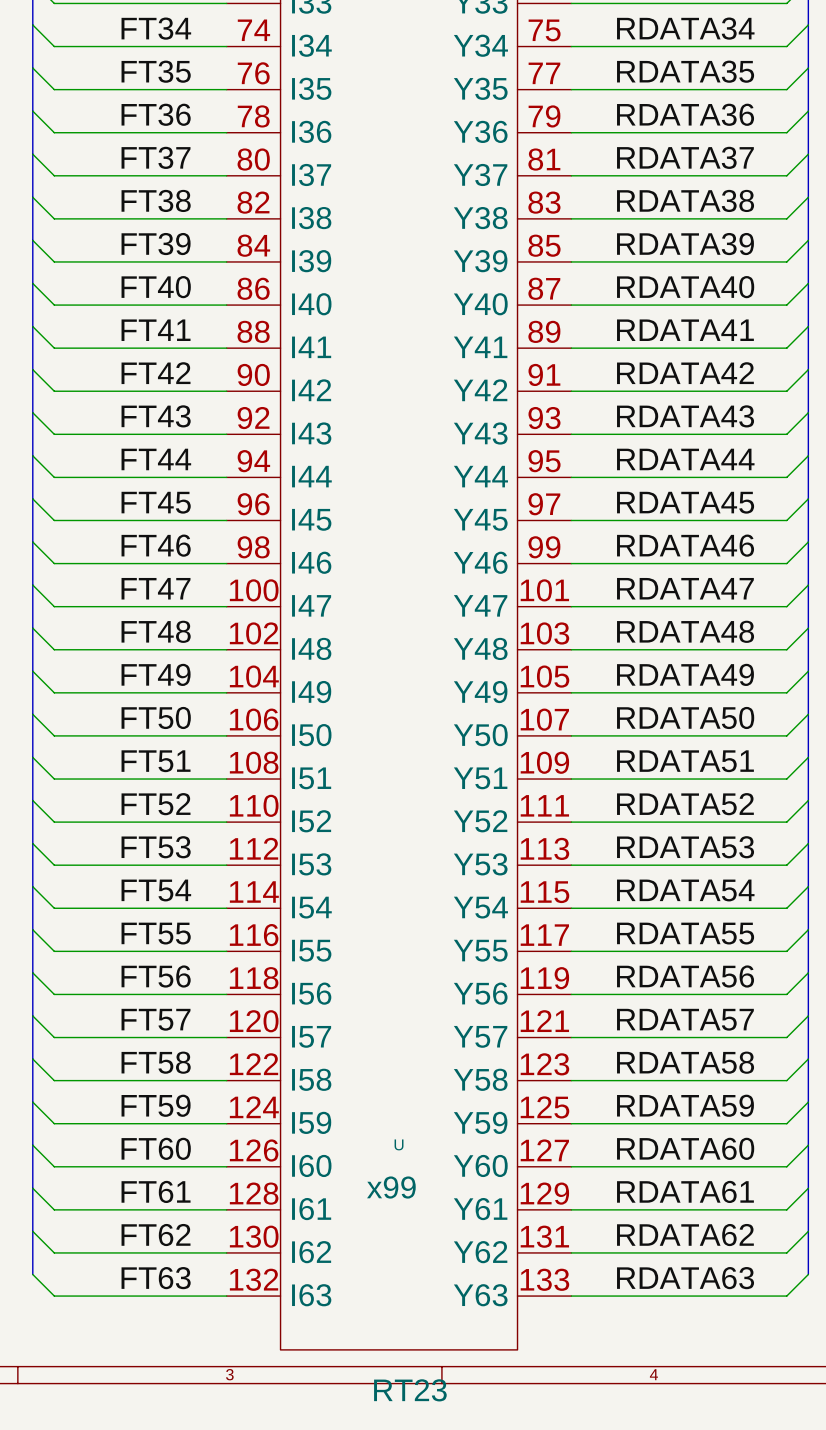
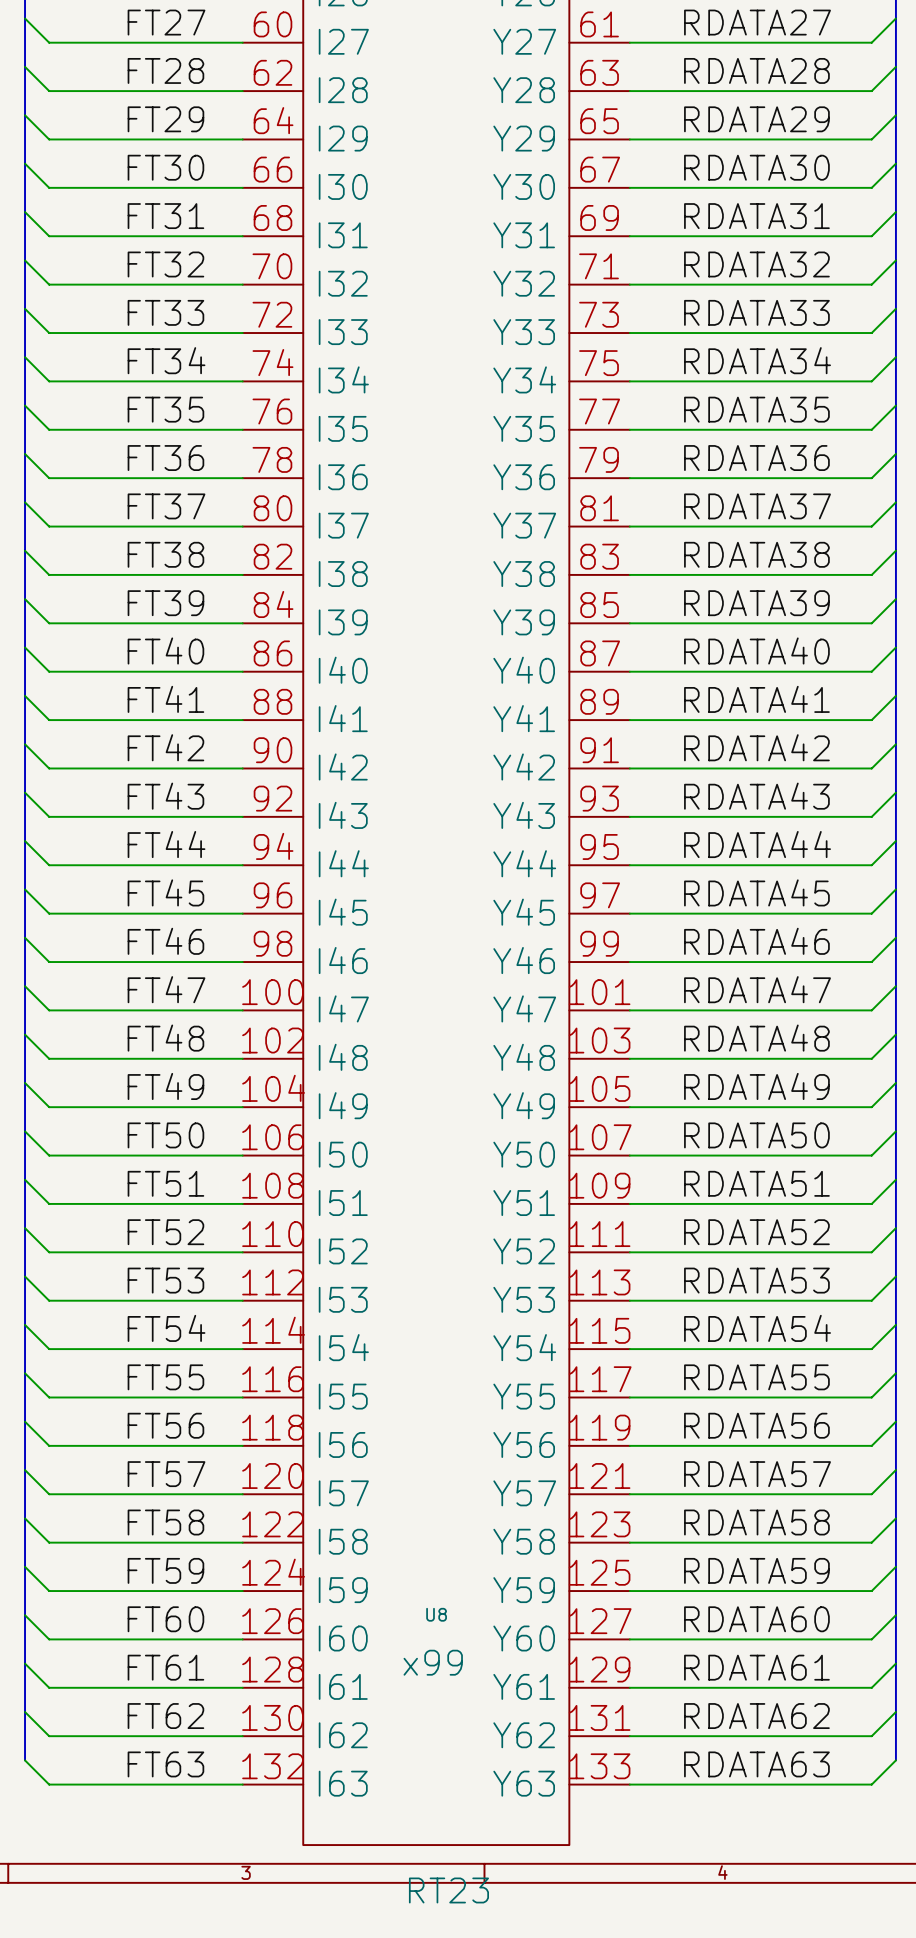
U name: U (399, 1144) -> U8 (436, 1614)

